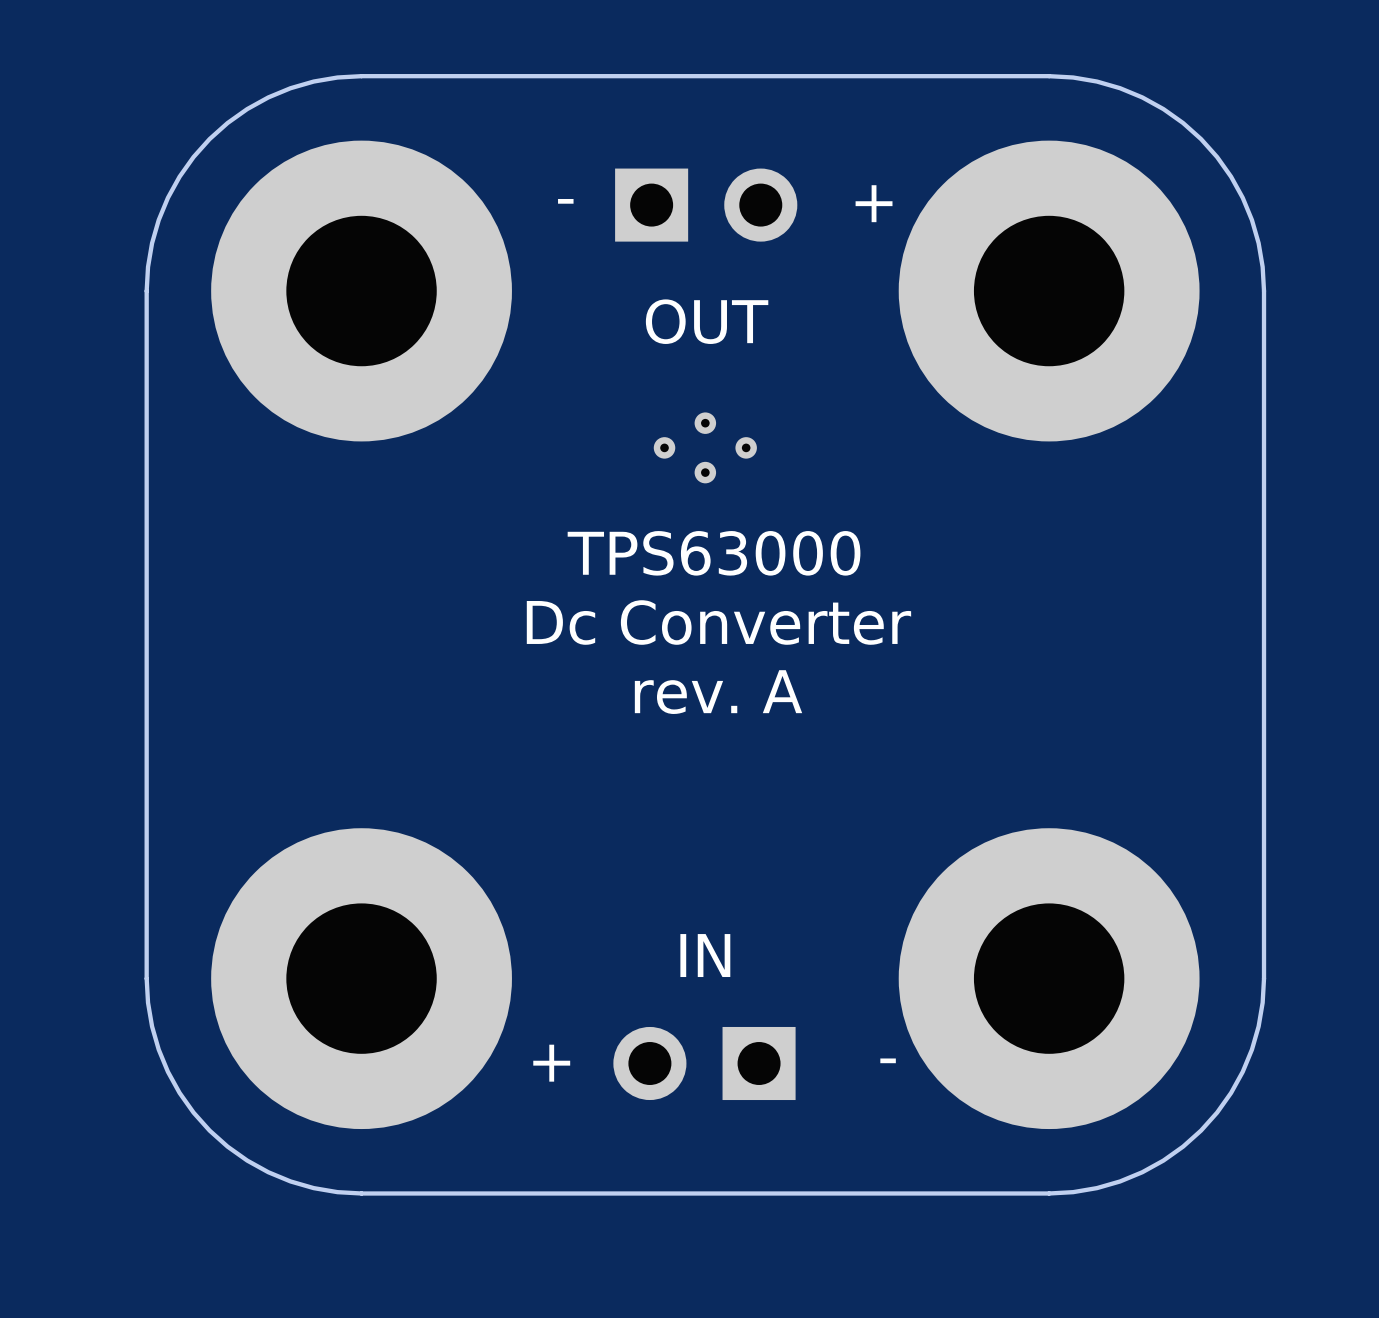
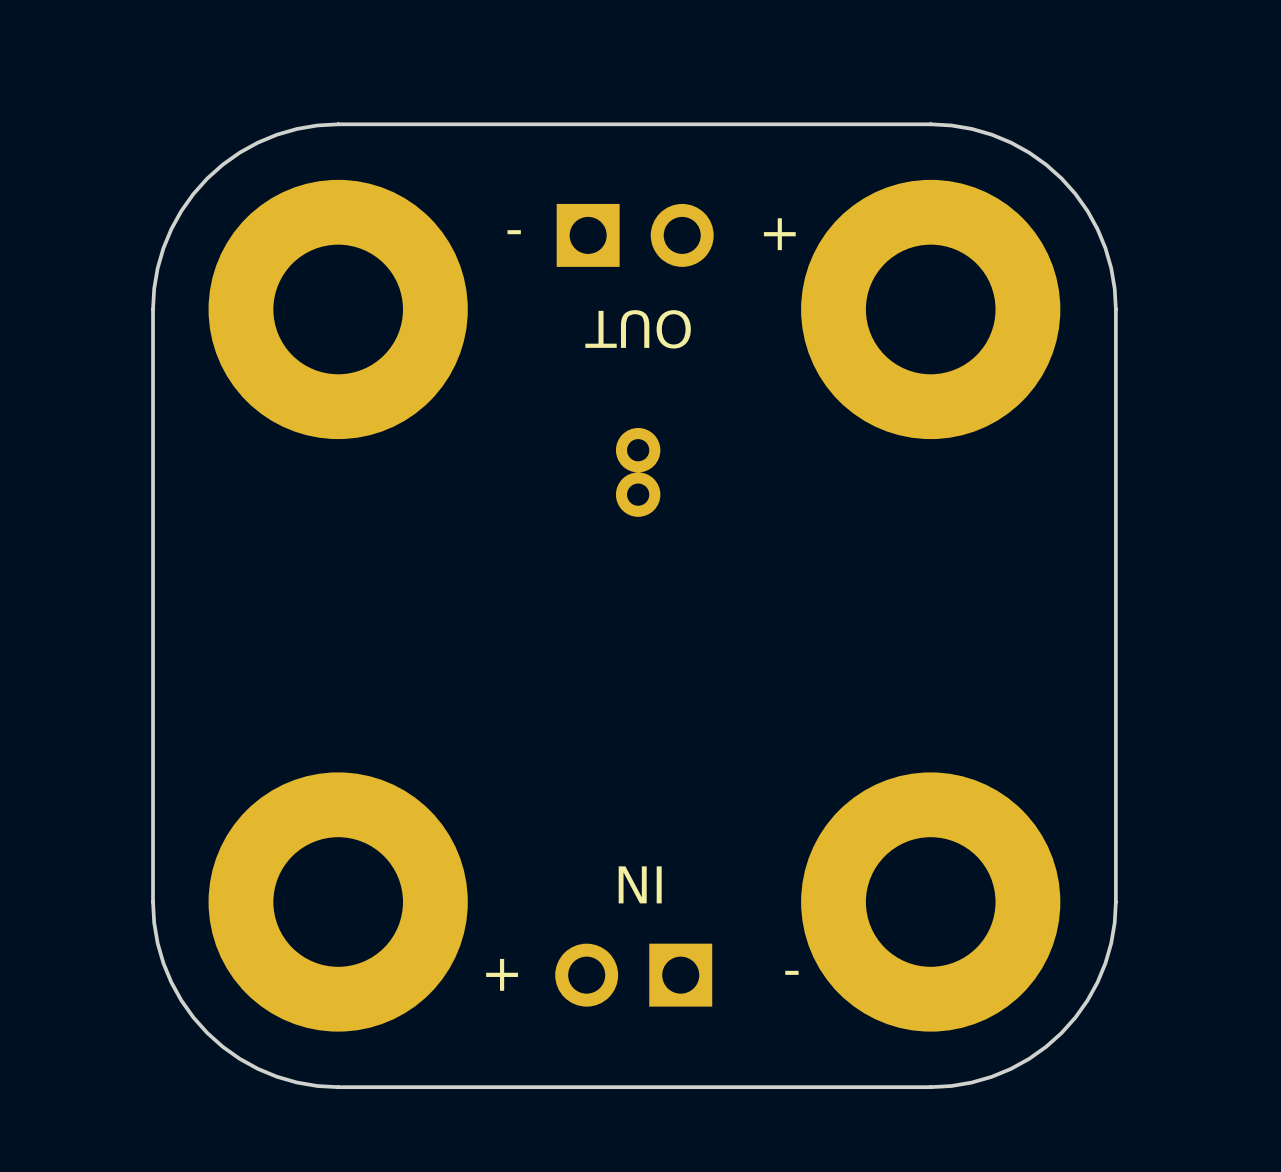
text rotation: 0° (707, 321) -> 180° (638, 329)
part footprint: [653, 412, 757, 484] -> [615, 427, 661, 517]
text: TPS63000 (714, 553) -> none
text: Dc Converter (718, 622) -> none
text: rev. A (718, 692) -> none
text rotation: 0° (705, 955) -> 180° (640, 884)

